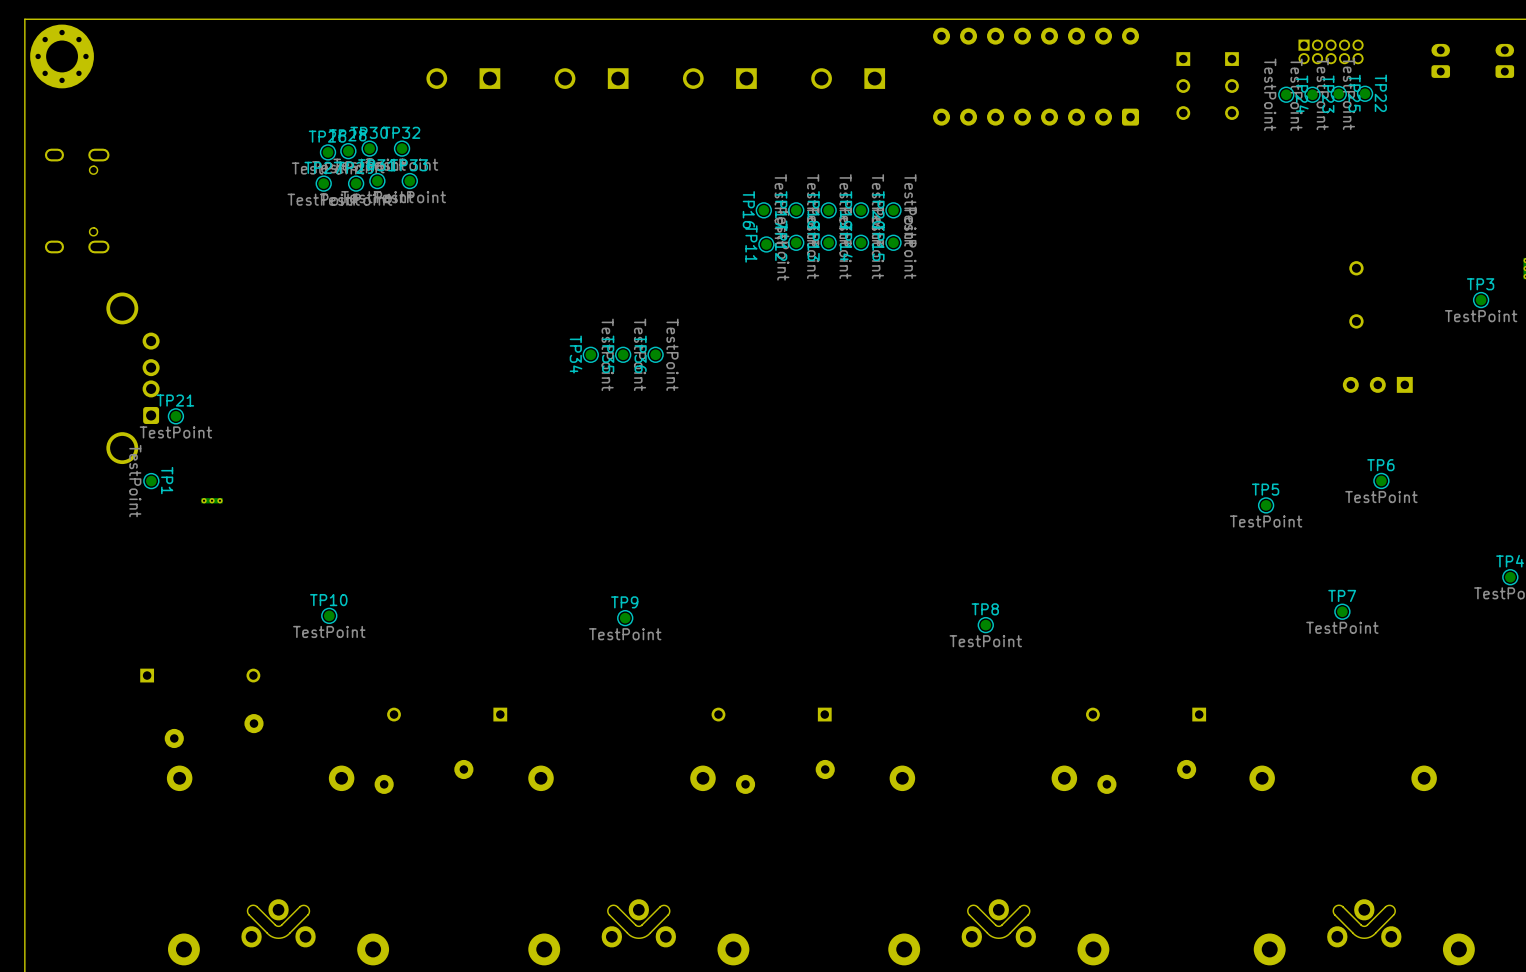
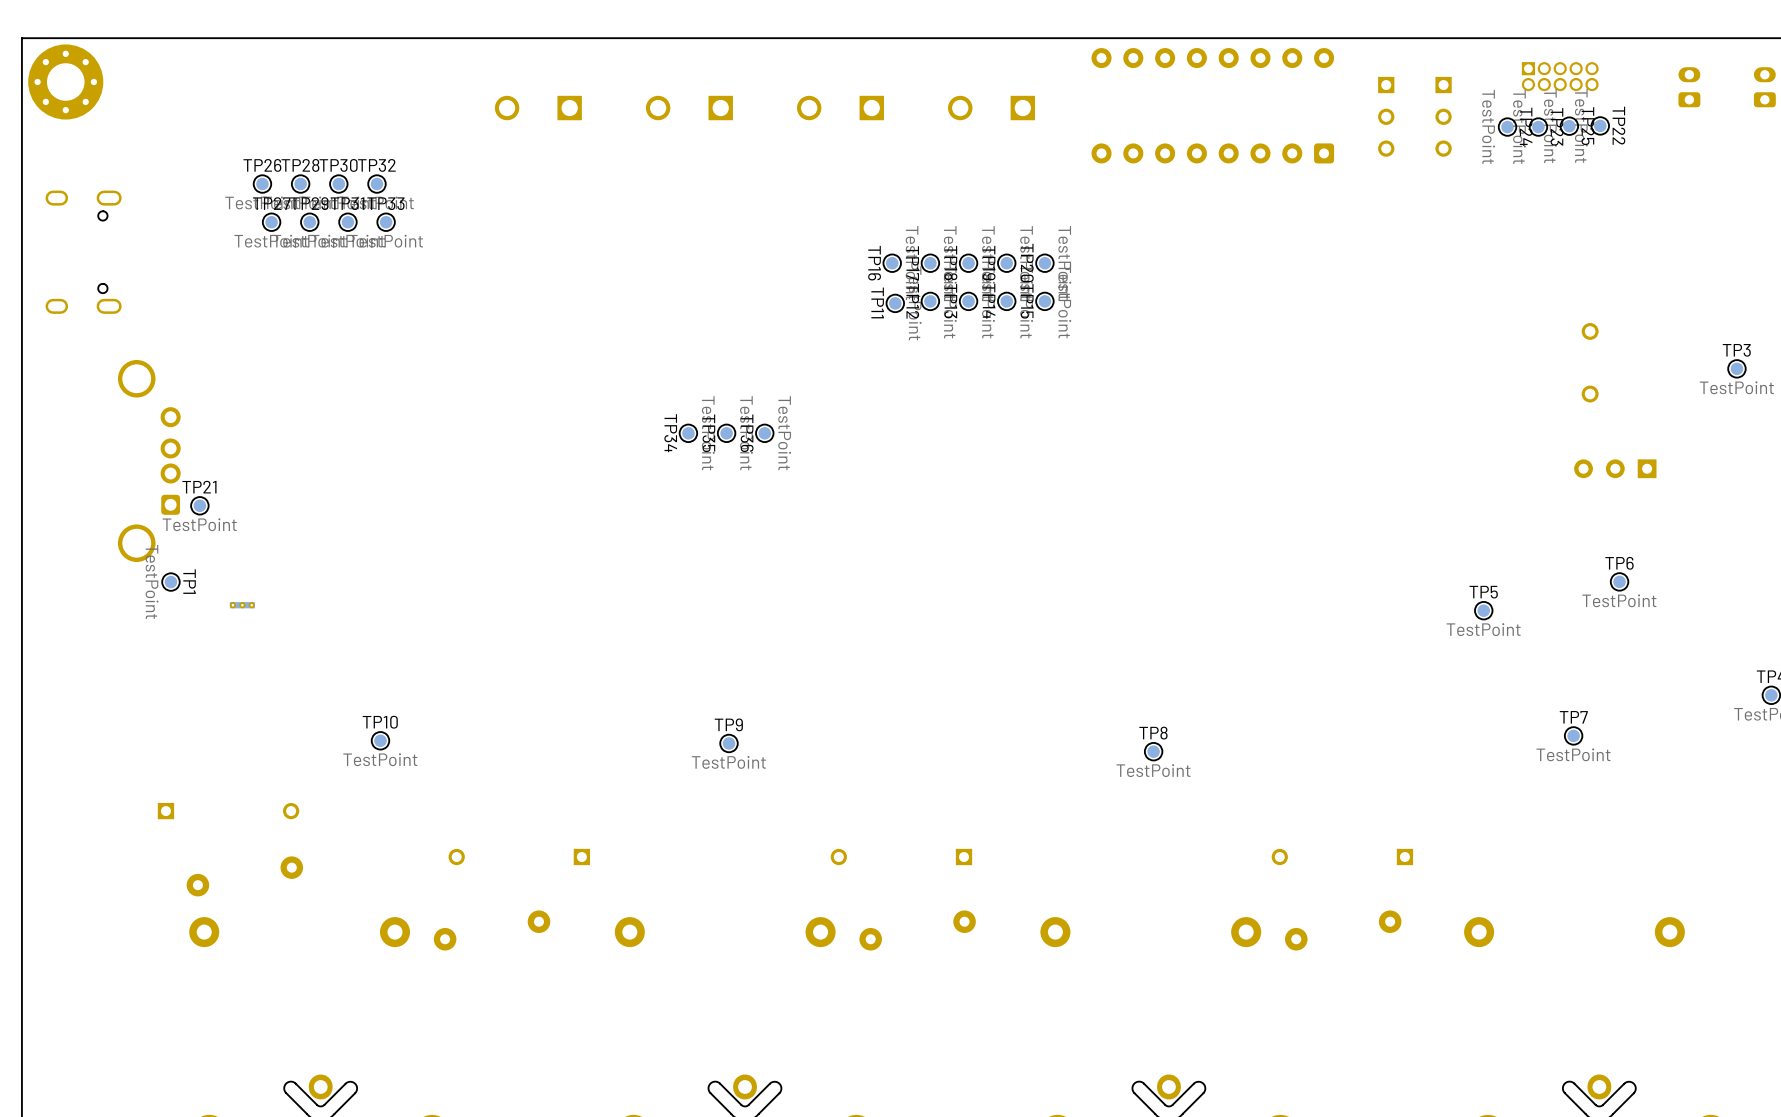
TP30 position: (369, 148) -> (338, 184)
TP32 position: (402, 148) -> (376, 184)
TP28 position: (348, 151) -> (300, 184)
TP26 position: (328, 152) -> (262, 184)
TP31 position: (377, 181) -> (347, 222)
TP33 position: (409, 181) -> (386, 222)
TP27 position: (323, 183) -> (271, 222)
TP29 position: (356, 183) -> (309, 222)

